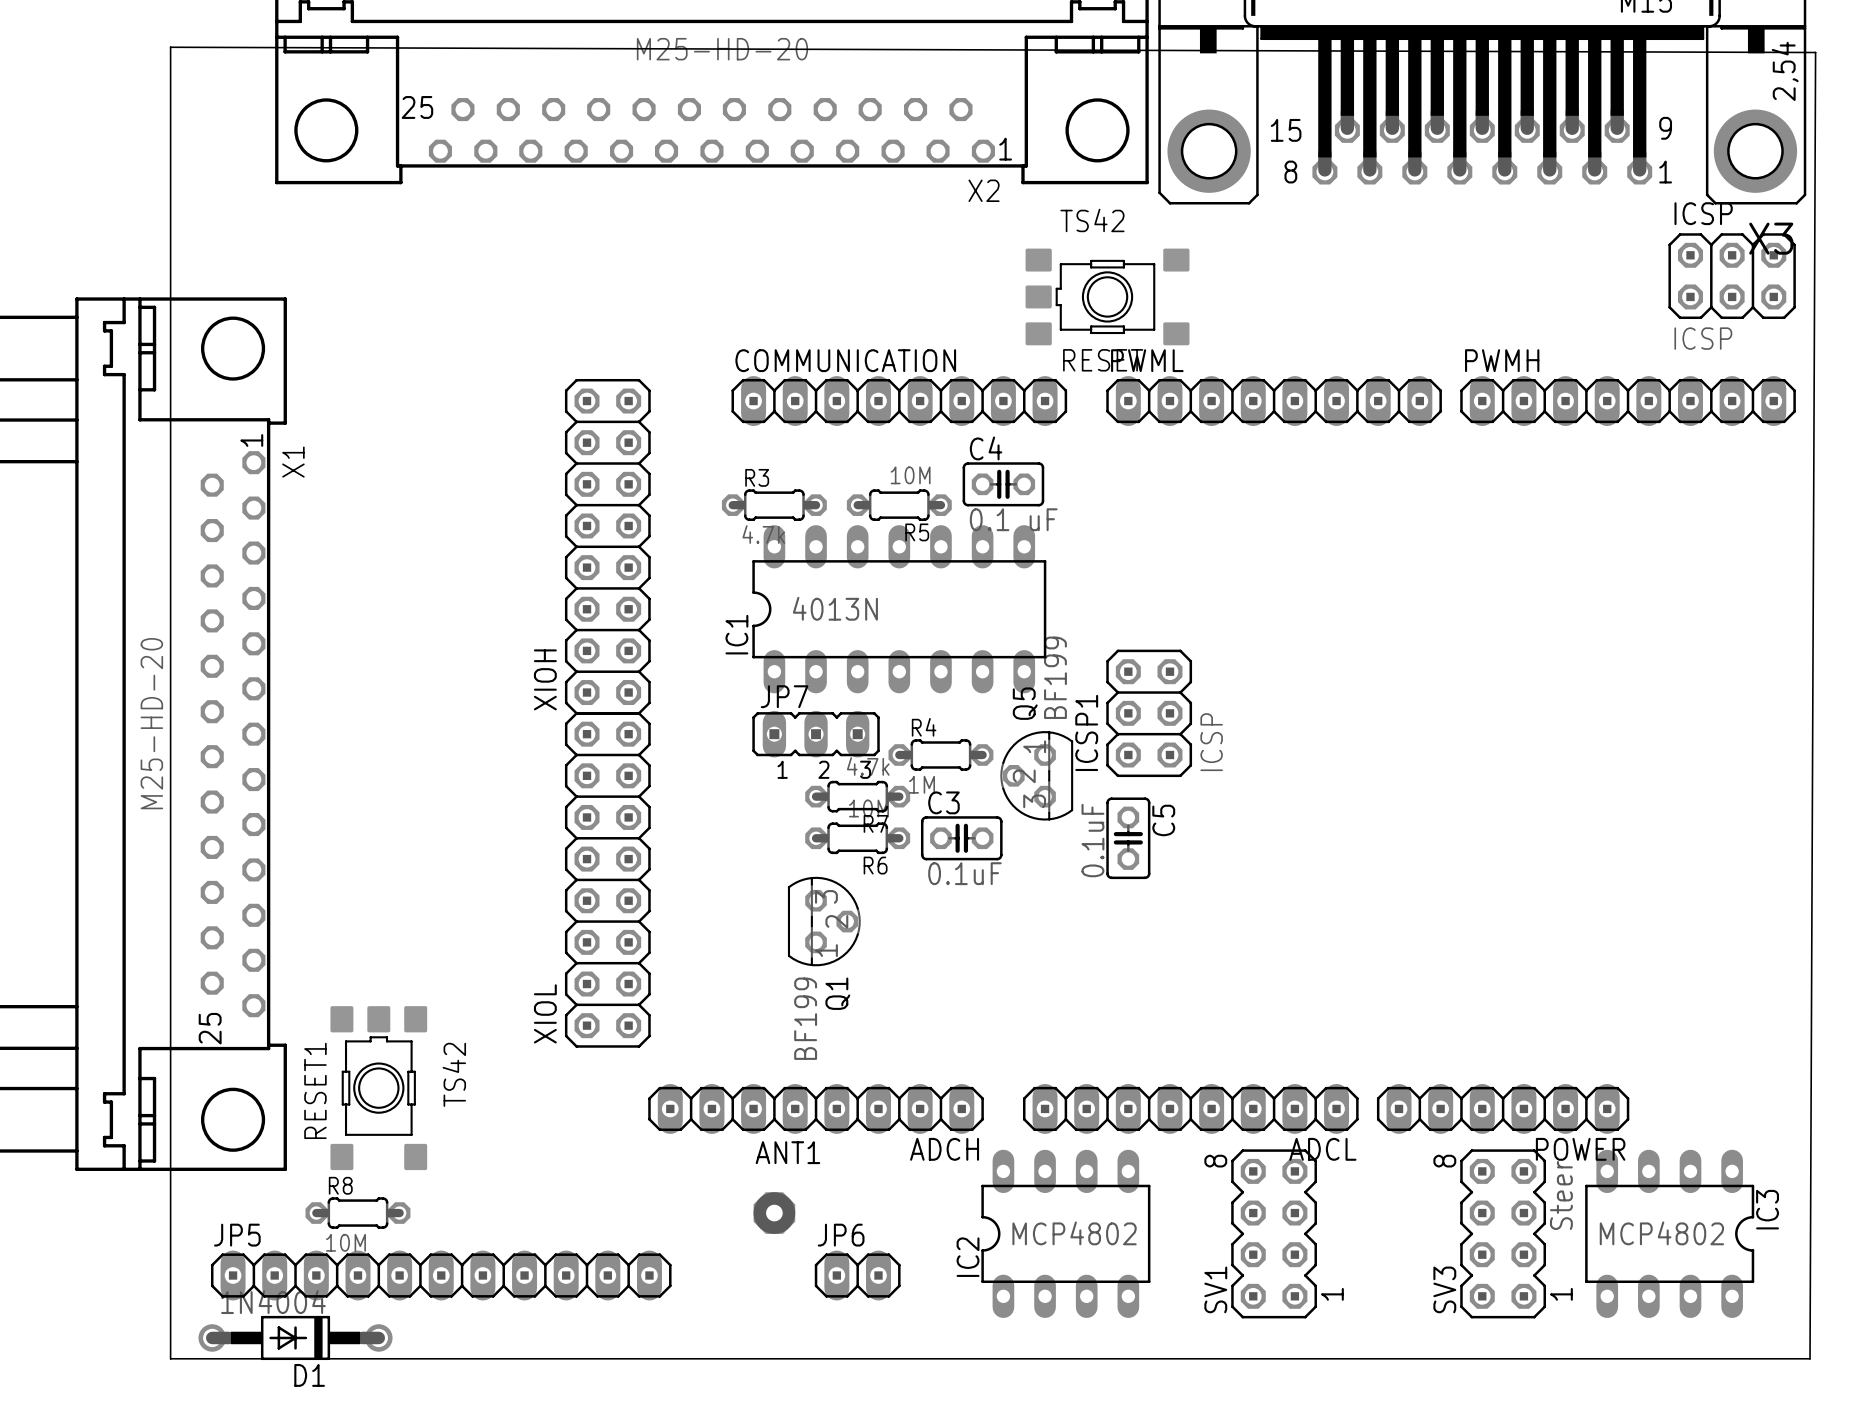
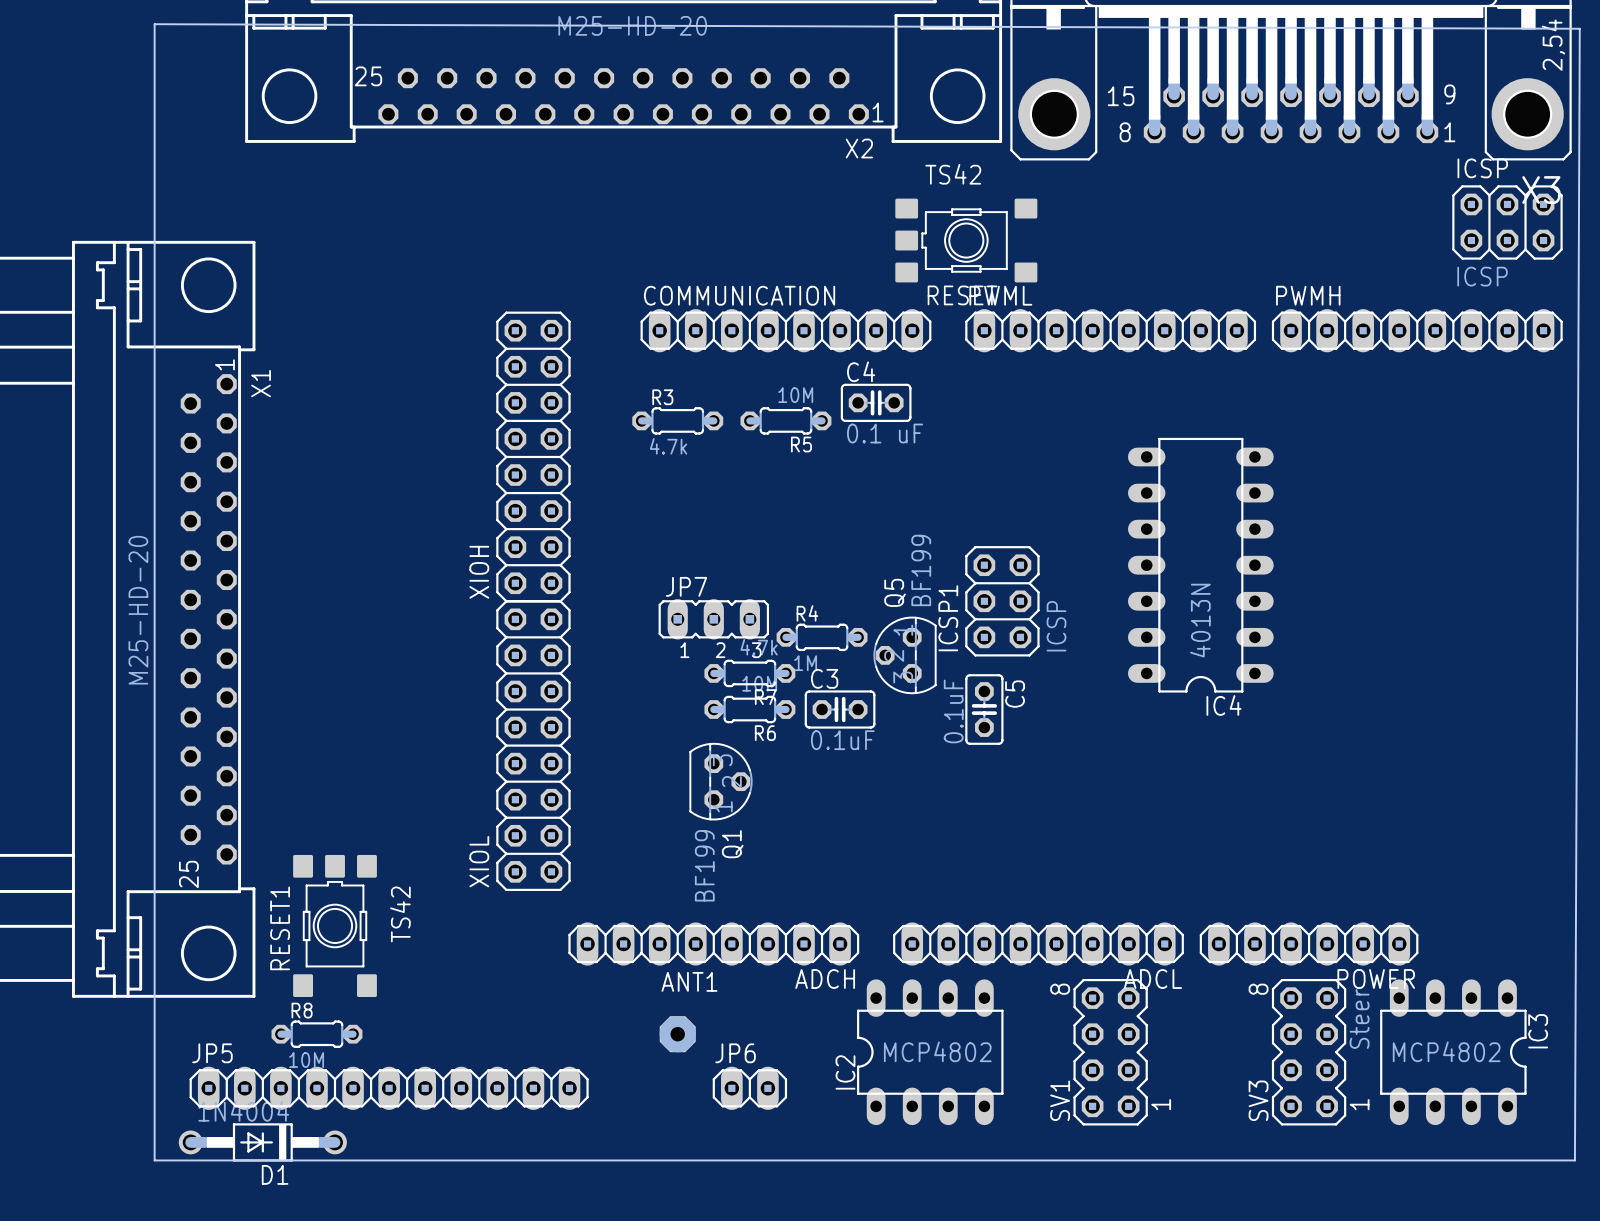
IC1: 4013N (899, 609) -> none
IC4: none -> 4013N (1200, 565)

